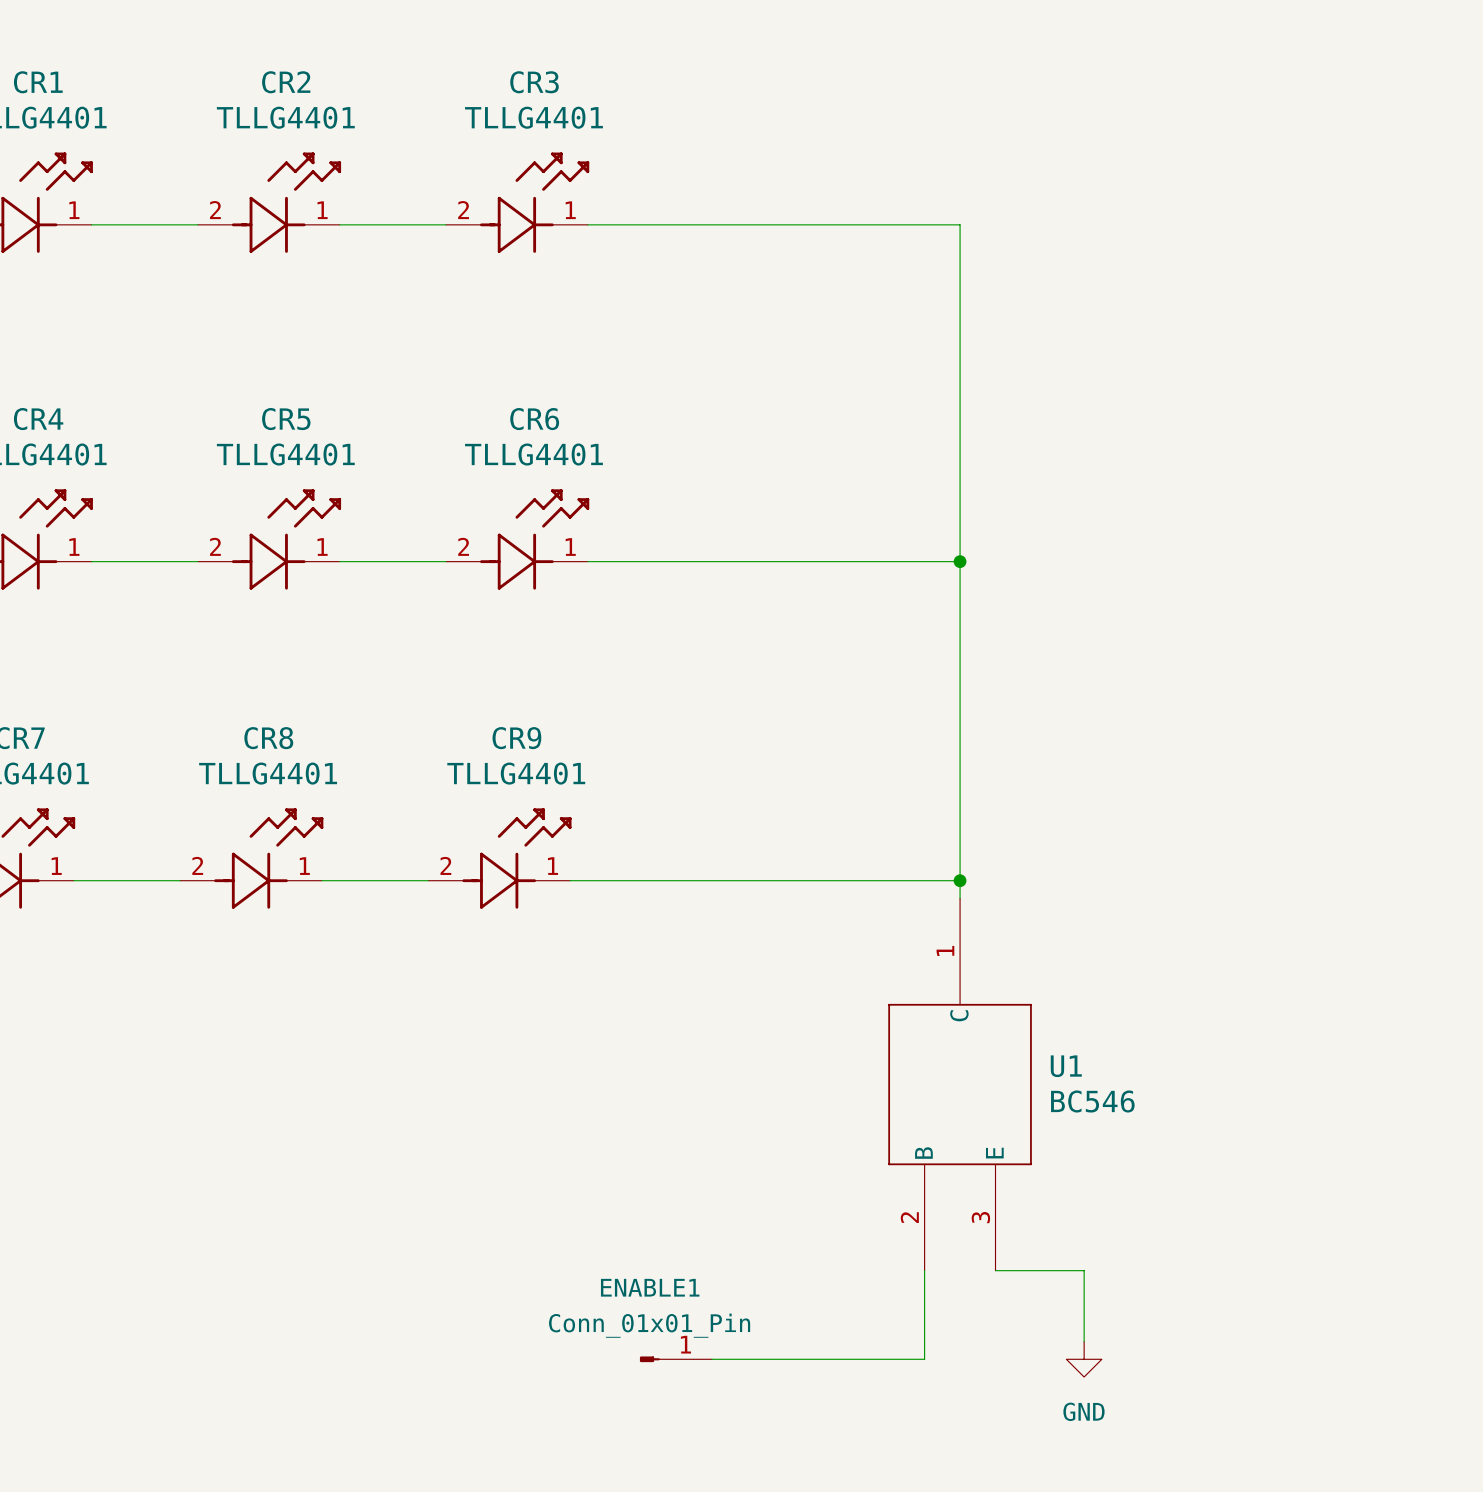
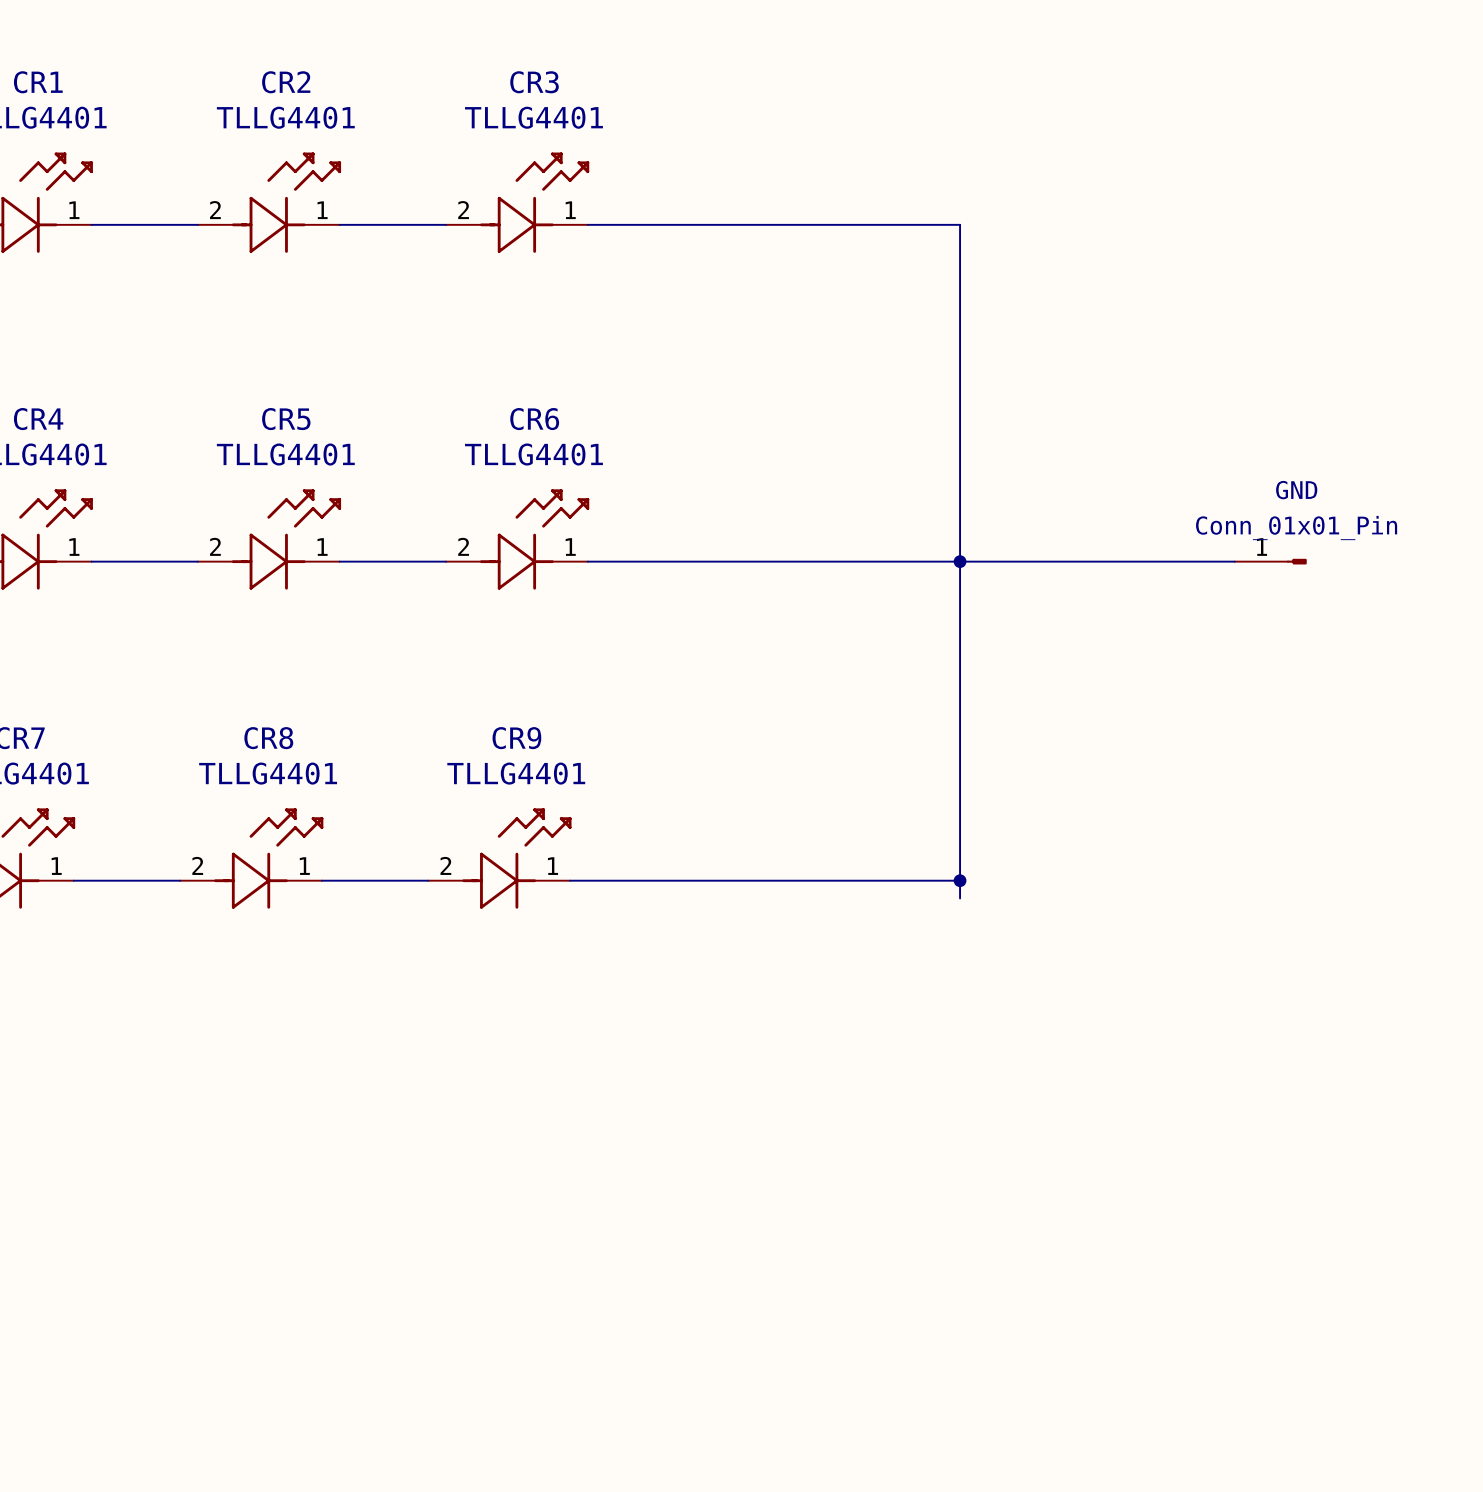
wire: none -> (960, 561) (1234, 561)
GND: none -> Conn_01x01_Pin (1270, 561)
U1: BC546 (960, 1084) -> none
wire: (924, 1270) (924, 1359) (711, 1359) -> none
wire: (995, 1270) (1084, 1270) (1084, 1341) -> none
ENABLE1: Conn_01x01_Pin (675, 1359) -> none
power symbol: GND (1084, 1359) -> none

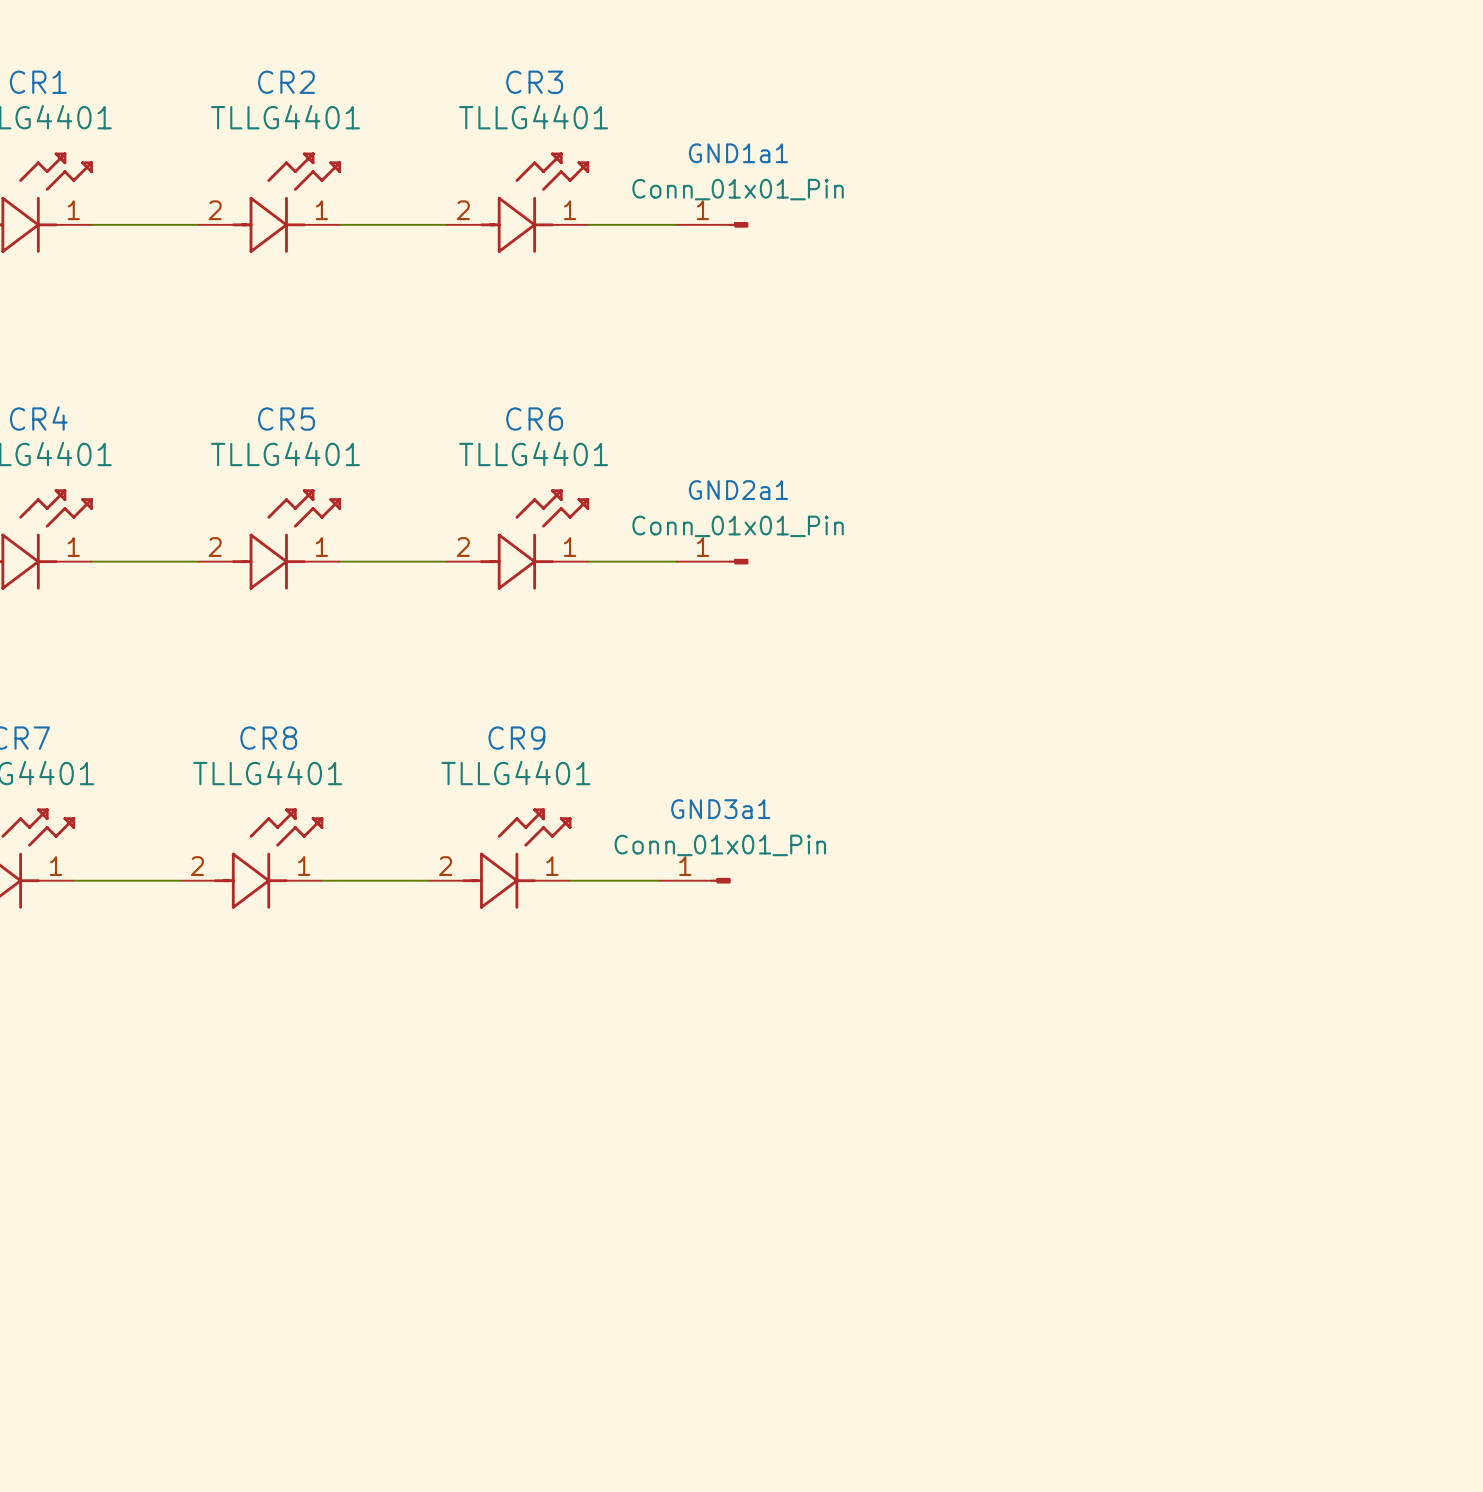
wire: (676, 224) (960, 224) (960, 898) -> none
GND1a1: none -> Conn_01x01_Pin (712, 224)
wire: (676, 561) (1234, 561) -> none
GND2a1: none -> Conn_01x01_Pin (712, 561)
junction: (960, 561) -> none
GND: Conn_01x01_Pin (1270, 561) -> none
wire: (658, 880) (960, 880) -> none
GND3a1: none -> Conn_01x01_Pin (694, 880)
junction: (960, 880) -> none

